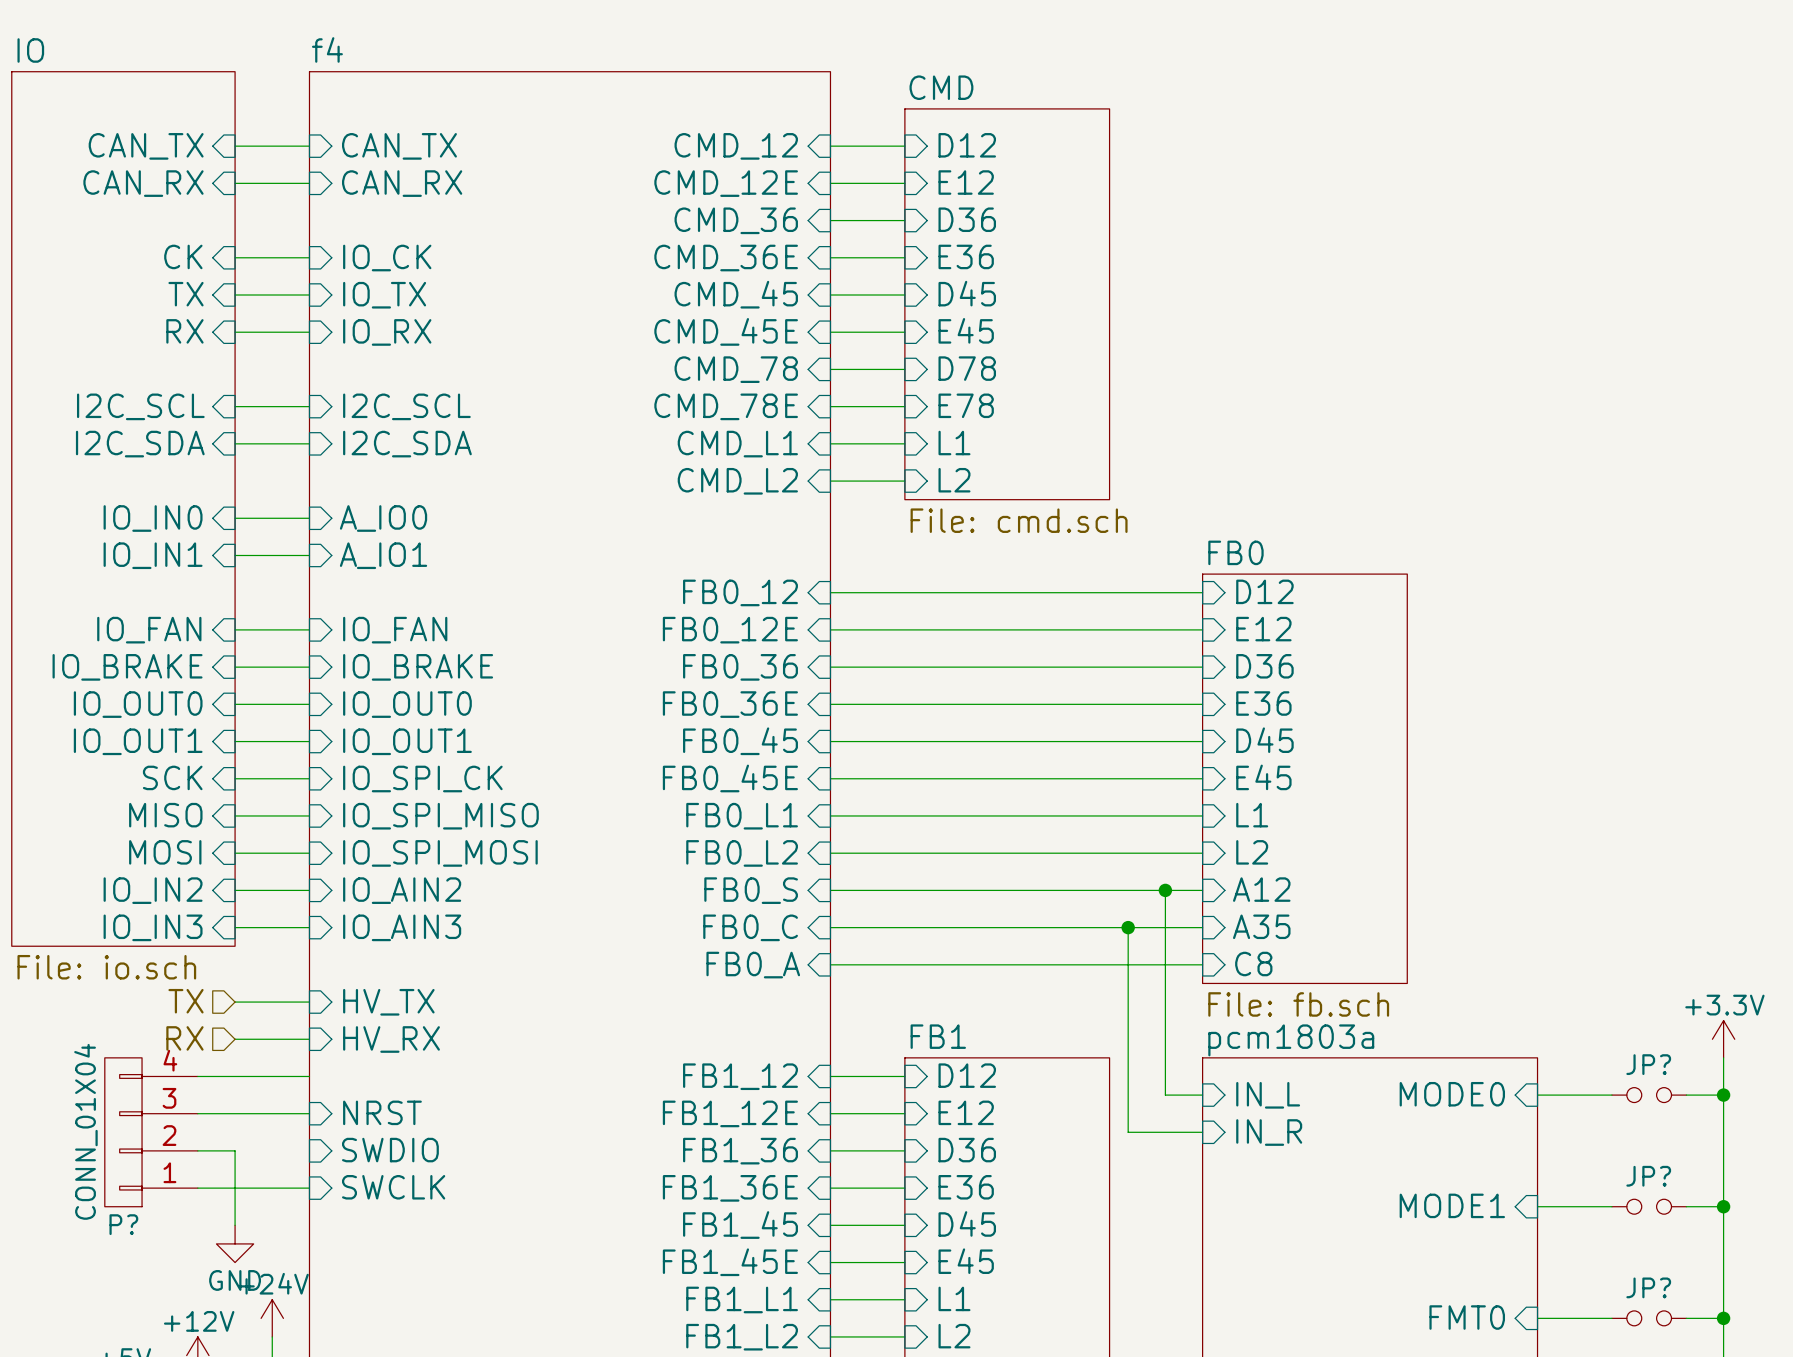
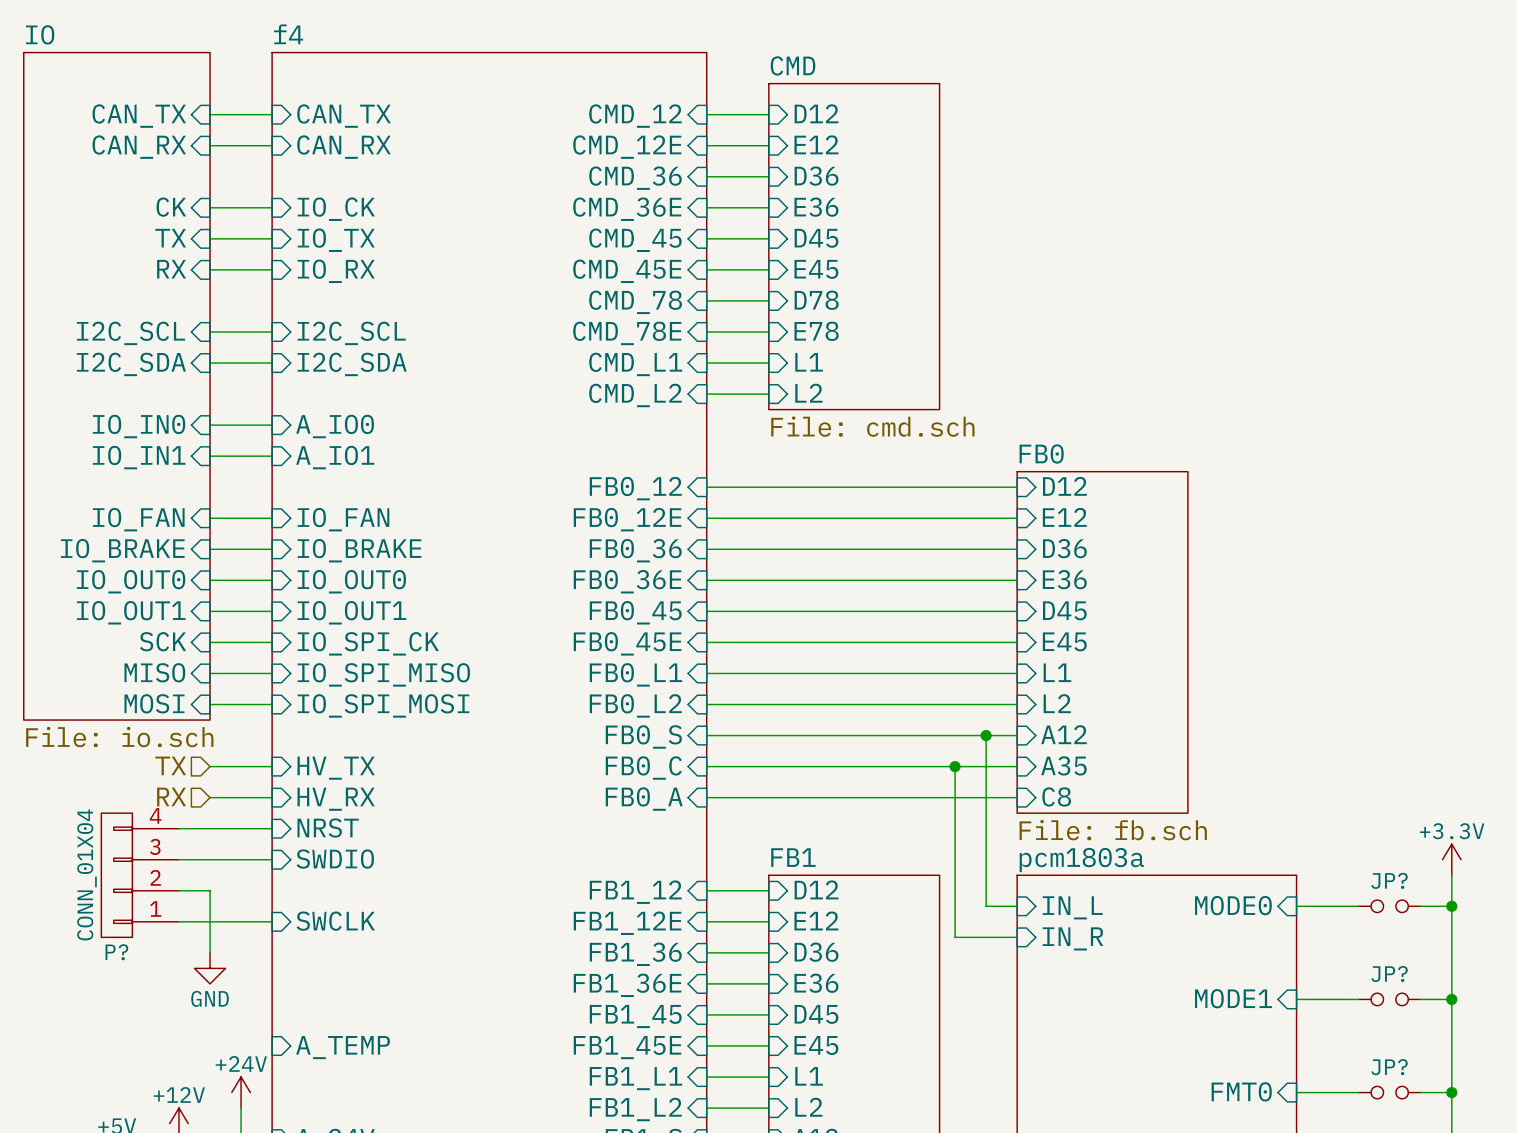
sheet IO: none -> File: io.sch (116, 386)
sheet IO: File: io.sch (123, 508) -> none
sheet pin: IO_IN2 (153, 890) -> none
wire: (235, 890) (309, 890) -> (210, 797) (272, 797)
sheet pin: IO_AIN2 (402, 890) -> none
sheet pin: IO_IN3 (153, 927) -> none
sheet pin: IO_AIN3 (402, 927) -> HV_TX (336, 768)
sheet pin: none -> HV_RX (336, 799)
hierarchical label position: TX (186, 1001) -> TX (170, 765)
wire: none -> (178, 828) (210, 828)
sheet pin: HV_TX (388, 1002) -> NRST (328, 828)
hierarchical label position: RX (184, 1038) -> RX (171, 796)
wire: none -> (178, 859) (210, 859)
sheet pin: HV_RX (391, 1039) -> SWDIO (335, 859)
wire: (235, 1076) (309, 1076) -> (210, 890) (210, 952)
sheet pin: NRST (382, 1112) -> SWCLK (335, 921)
P? position: (151, 1132) -> (140, 875)
wire: (197, 1150) (235, 1150) (235, 1225) -> none
sheet pin: SWDIO (390, 1150) -> none
sheet pin: SWCLK (393, 1187) -> none
wire: (197, 1188) (309, 1188) -> none
power symbol position: GND (235, 1243) -> GND (210, 968)
sheet pin: none -> A_TEMP (343, 1047)

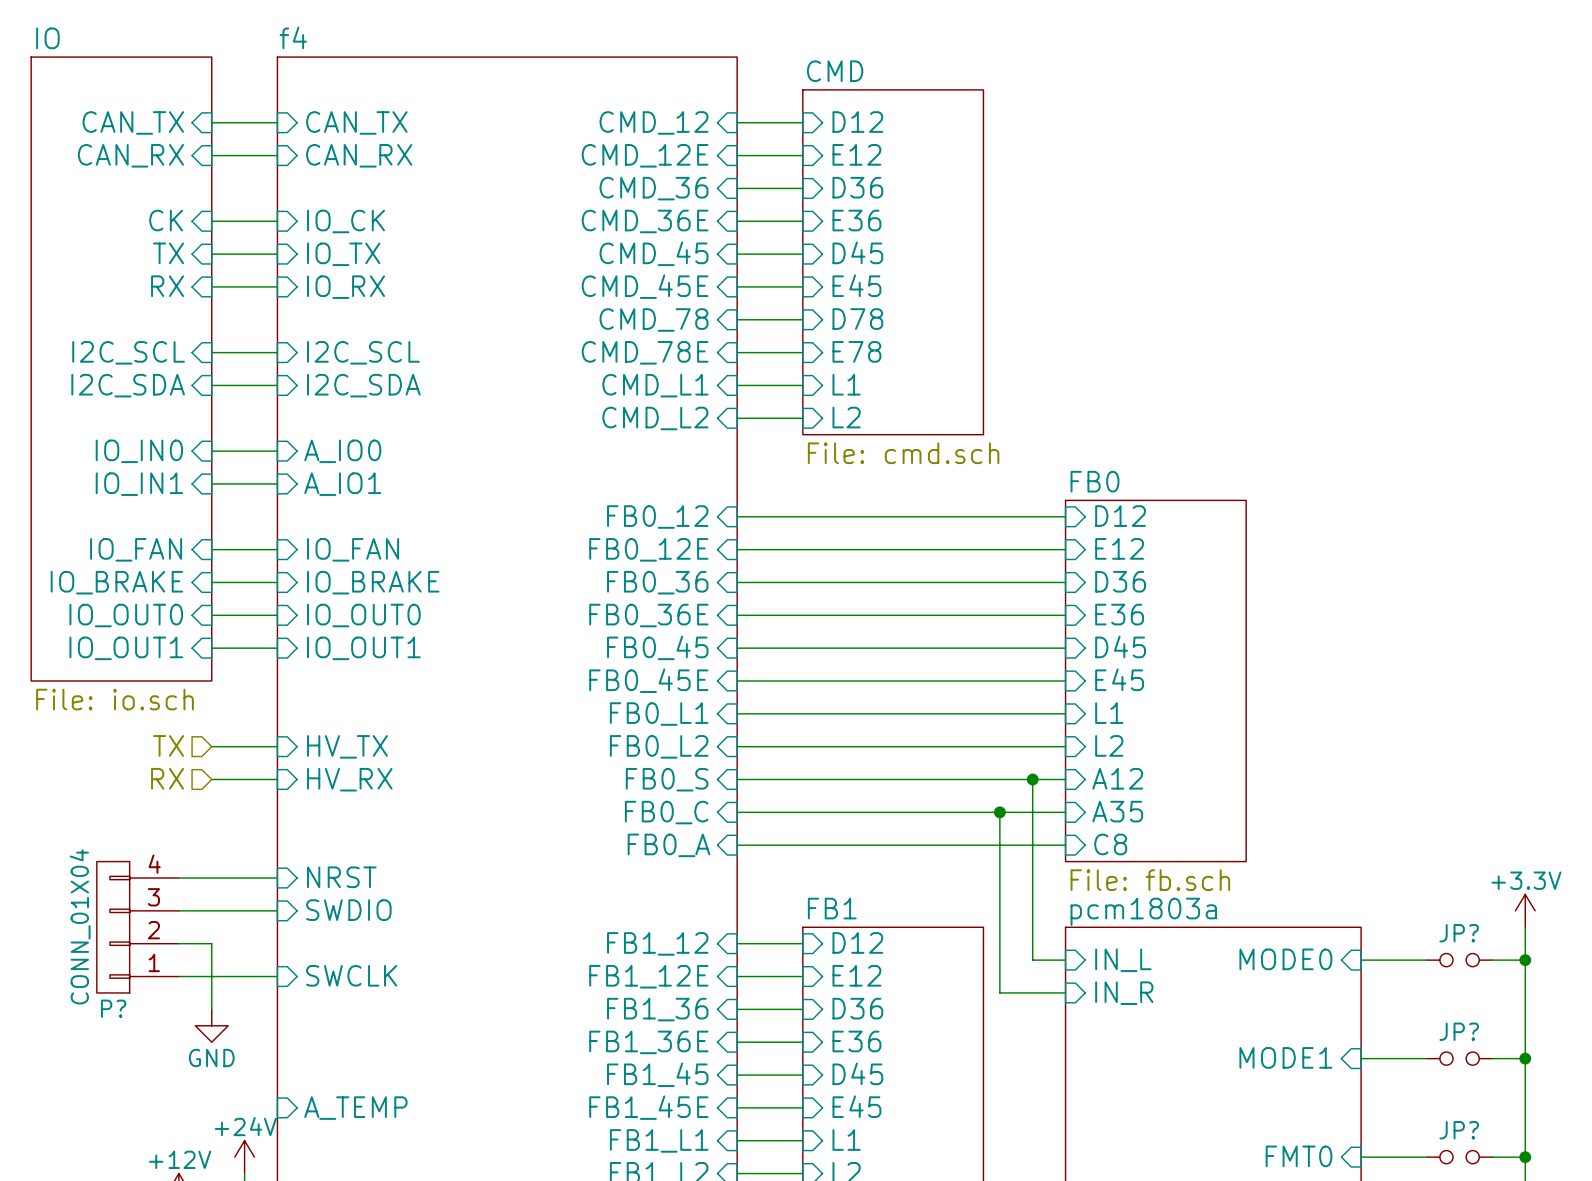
sheet IO: none -> File: io.sch (121, 369)
sheet IO: File: io.sch (116, 386) -> none
sheet pin: SCK (163, 641) -> none
wire: (210, 642) (272, 642) -> none
sheet pin: IO_SPI_CK (368, 643) -> none
sheet pin: MISO (154, 672) -> none
wire: (210, 673) (272, 673) -> none
sheet pin: IO_SPI_MISO (383, 674) -> none
sheet pin: MOSI (154, 703) -> none
sheet pin: IO_SPI_MOSI (383, 705) -> HV_TX (347, 746)
hierarchical label position: TX (170, 765) -> TX (168, 745)
wire: (210, 766) (272, 766) -> (211, 779) (277, 779)
sheet pin: HV_TX (336, 768) -> none
hierarchical label position: RX (171, 796) -> RX (167, 778)
wire: (210, 797) (272, 797) -> none
sheet pin position: HV_RX (336, 799) -> HV_RX (349, 779)

